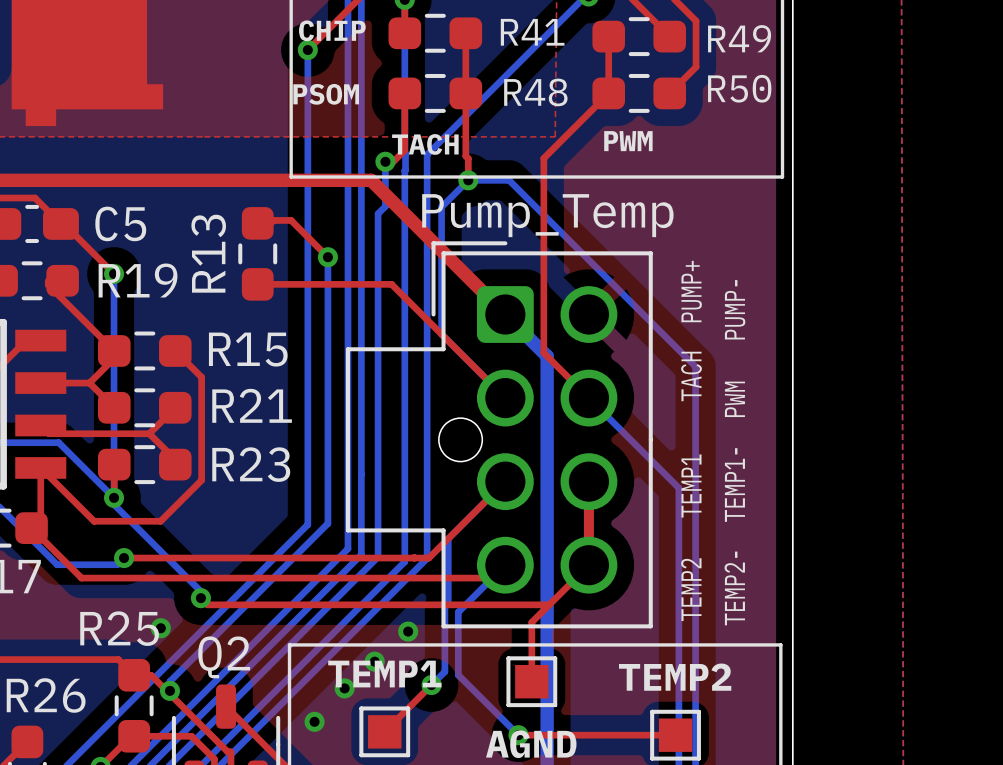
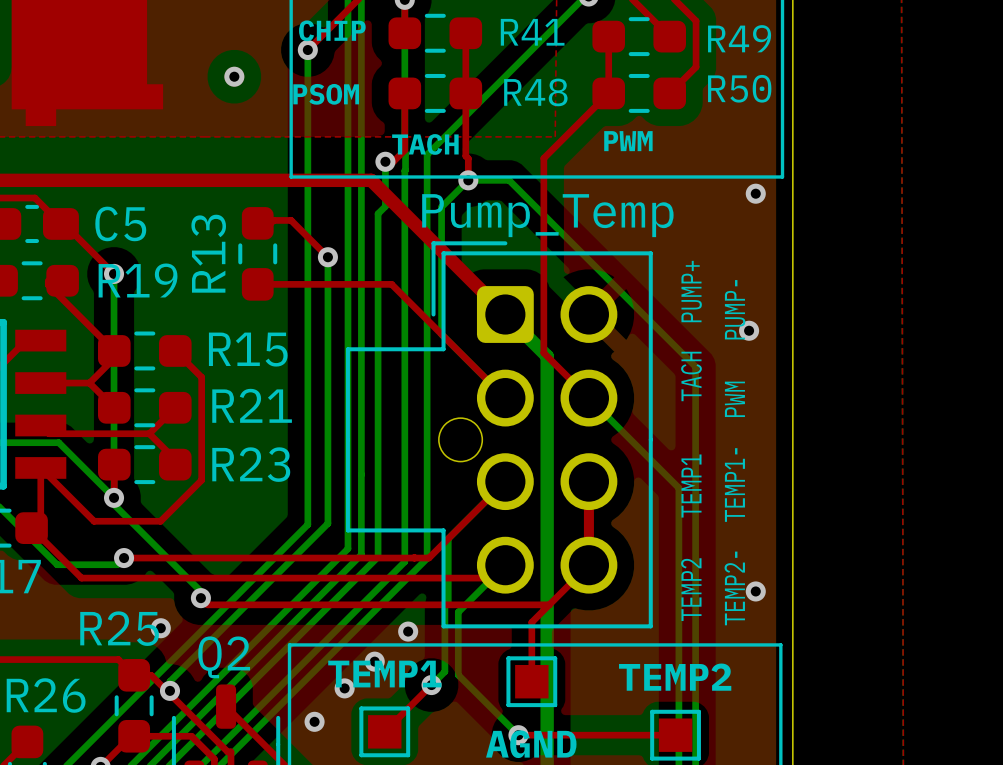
via: none -> (234, 76)
via: none -> (755, 193)
via: none -> (749, 330)
via: none -> (755, 591)

